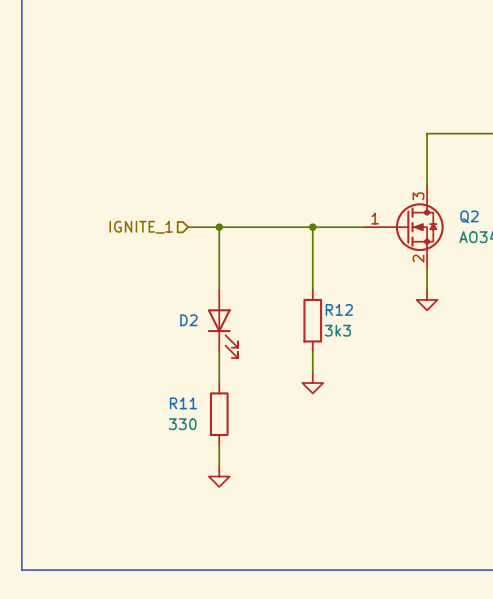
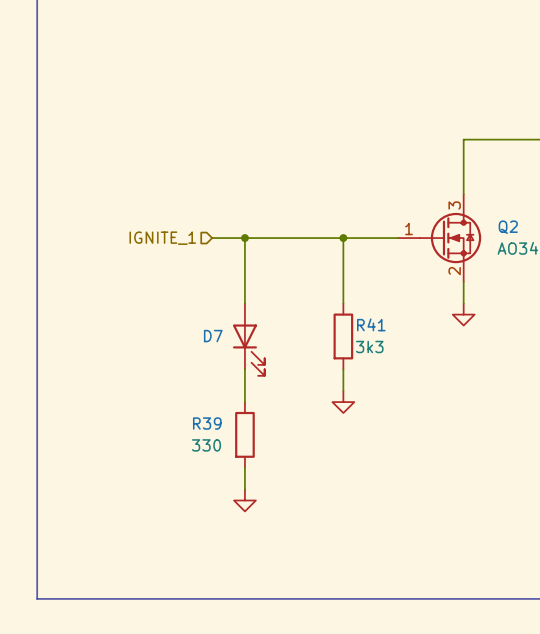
R12 name: R12 (339, 309) -> R41 (371, 324)
D2 name: D2 (188, 320) -> D7 (213, 336)
R11 name: R11 (183, 403) -> R39 (207, 423)

